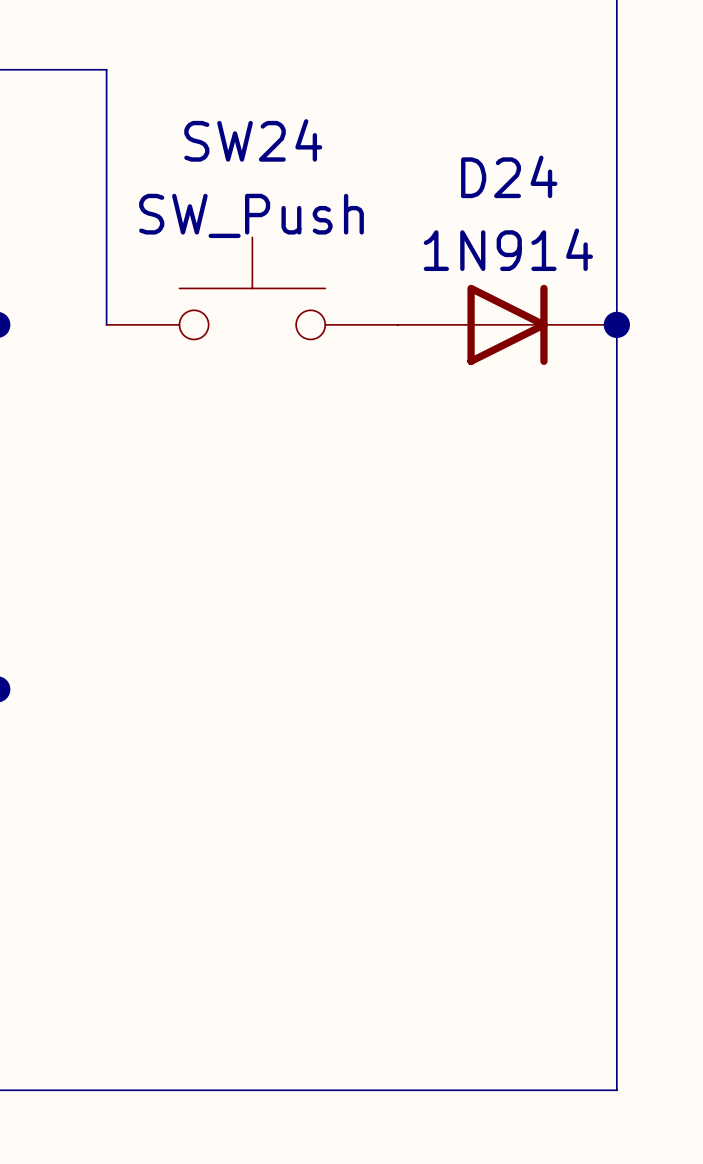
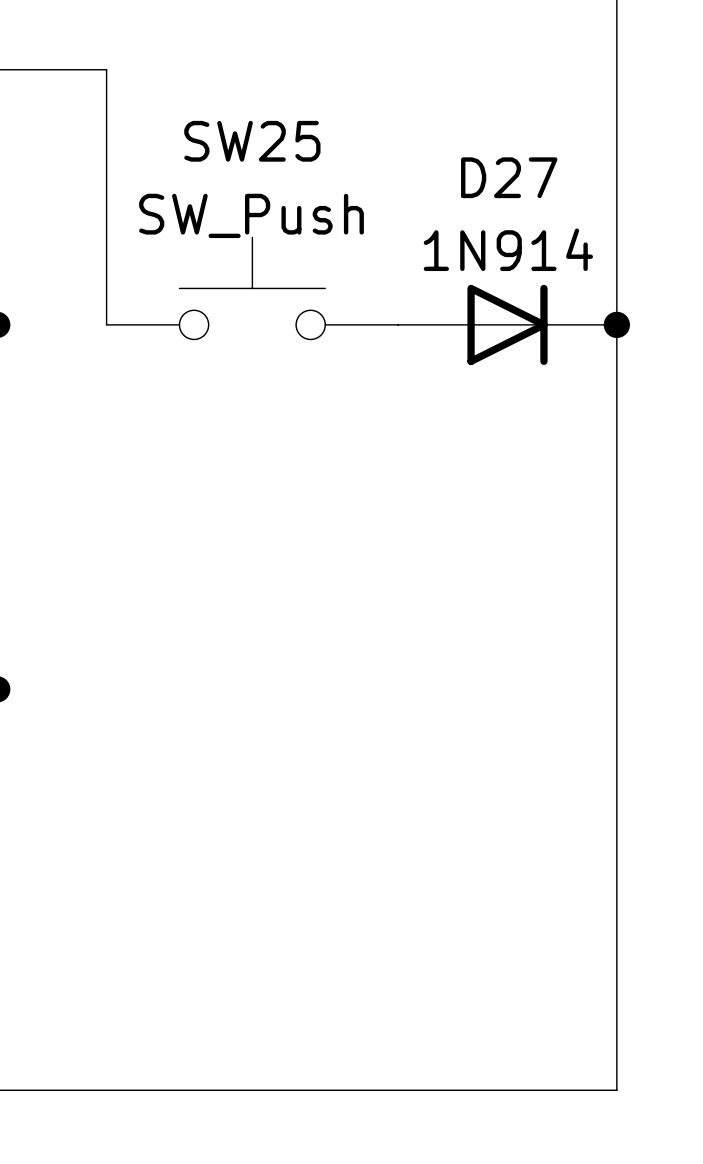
SW24 name: SW24 (253, 140) -> SW25 (252, 141)
D24 name: D24 (509, 176) -> D27 (509, 177)

